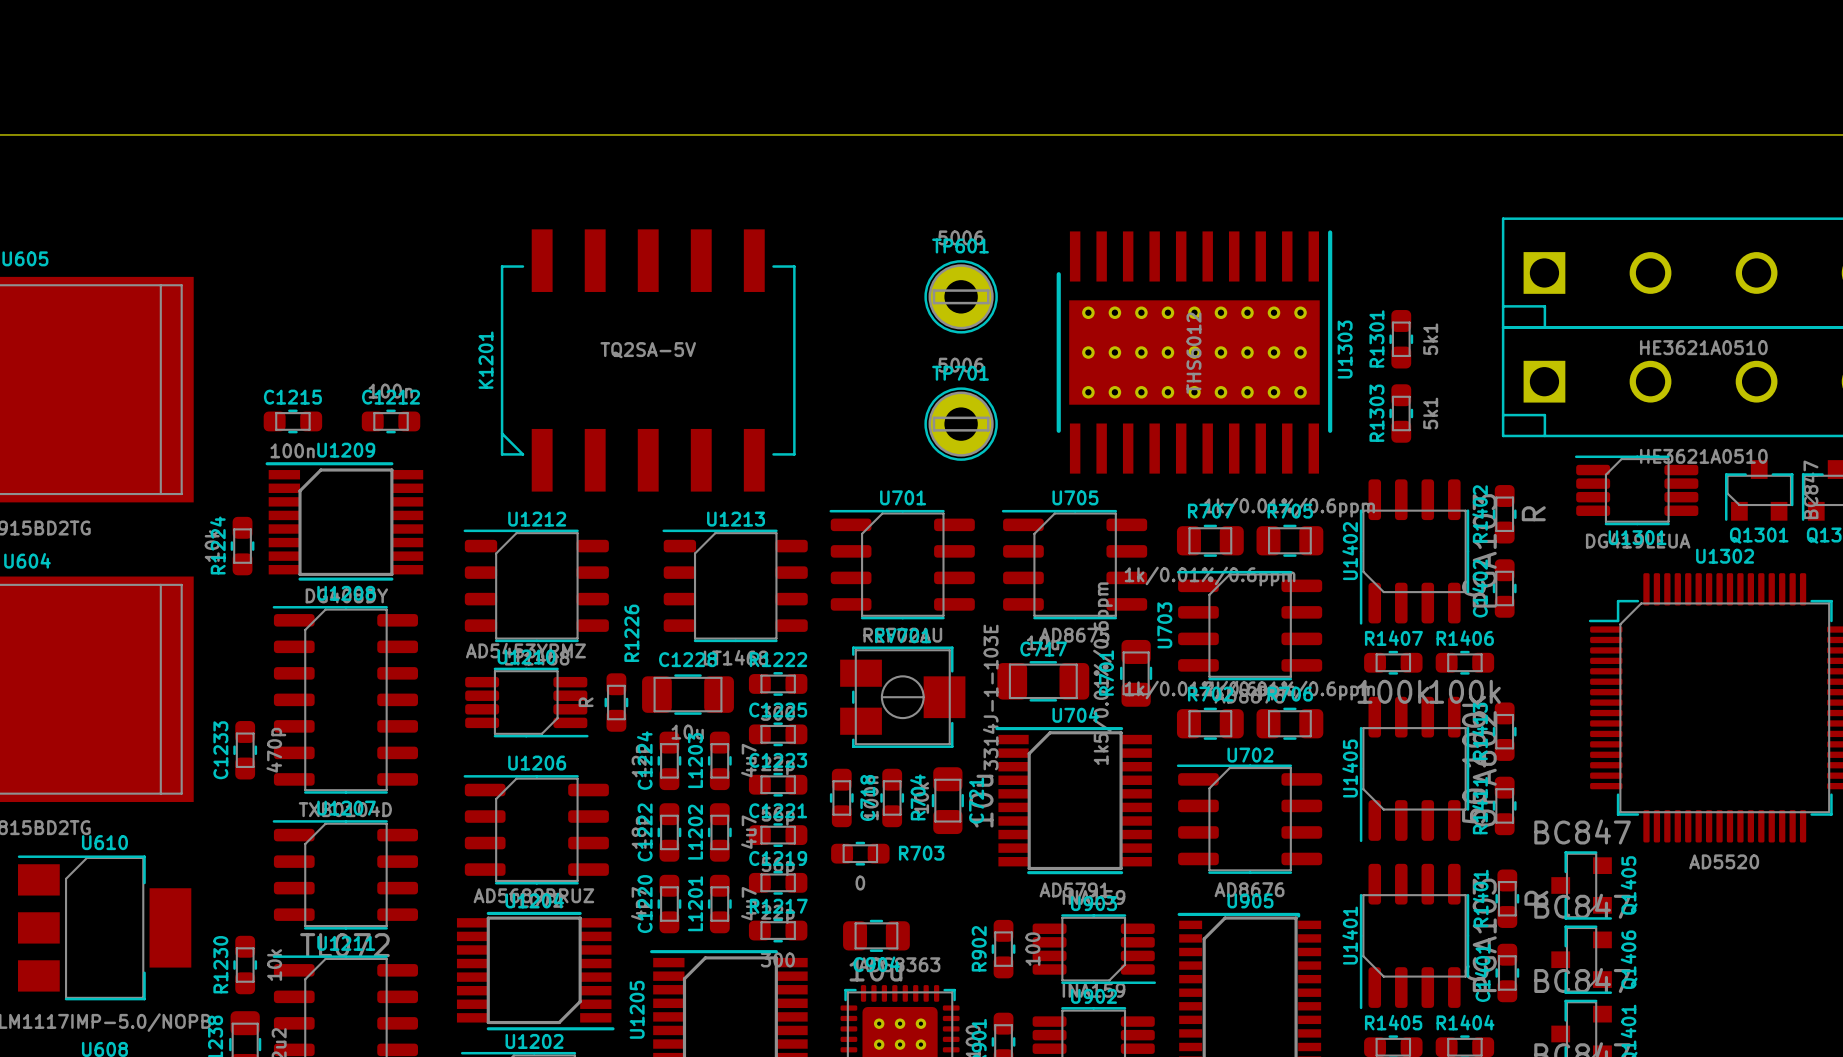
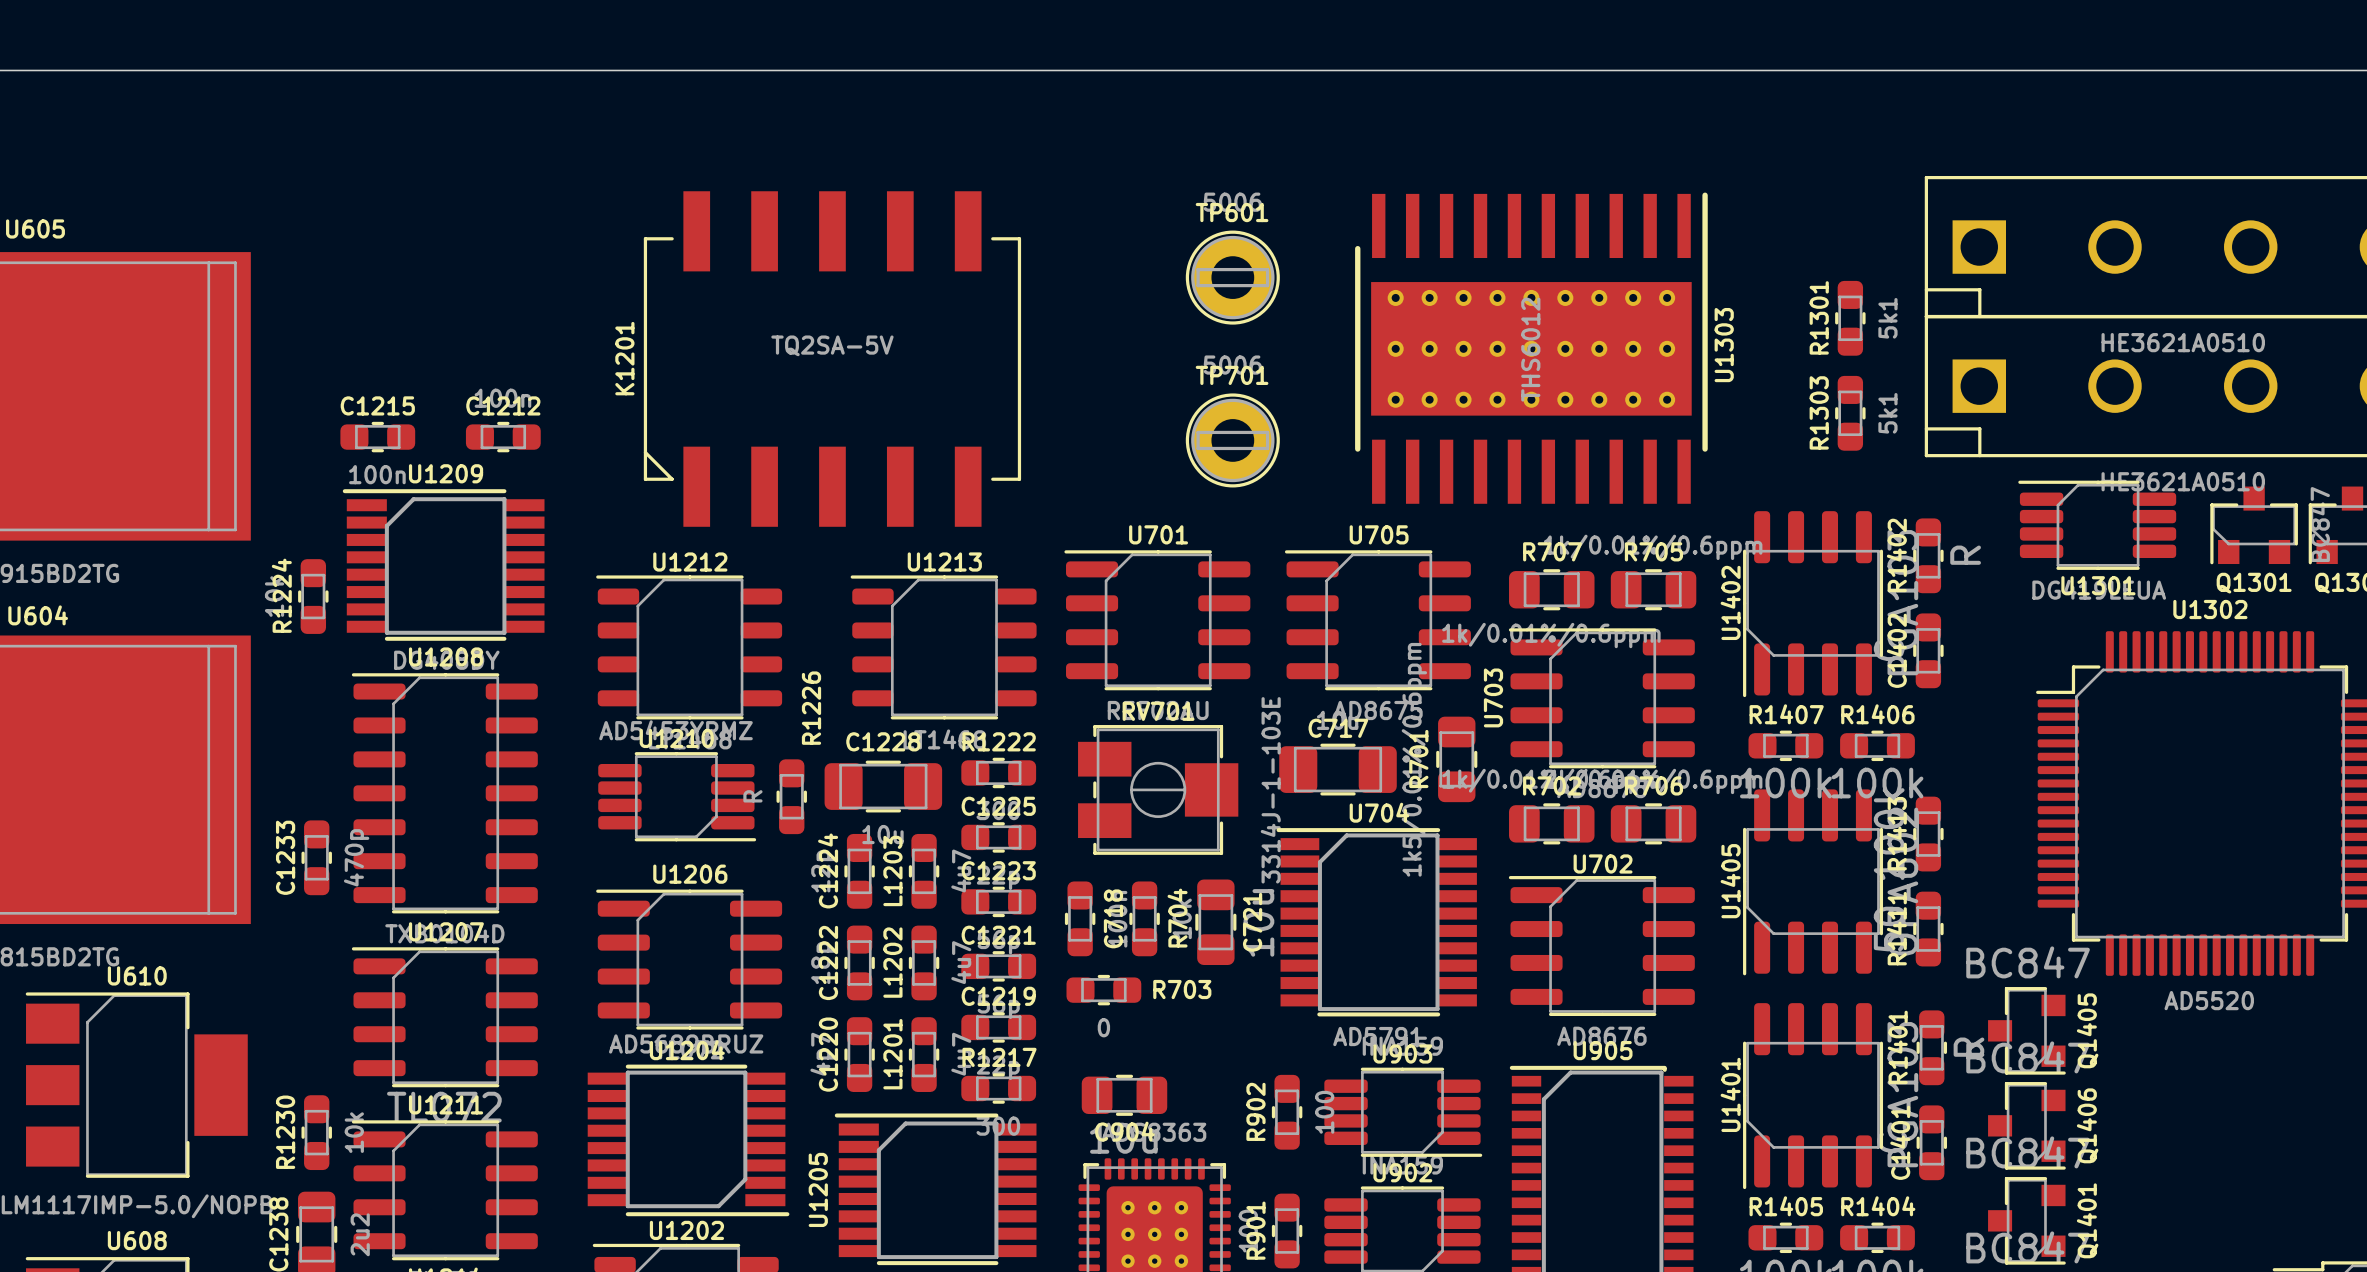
R1301 position: (1401, 339) -> (1850, 318)
R1303 position: (1401, 413) -> (1850, 413)

